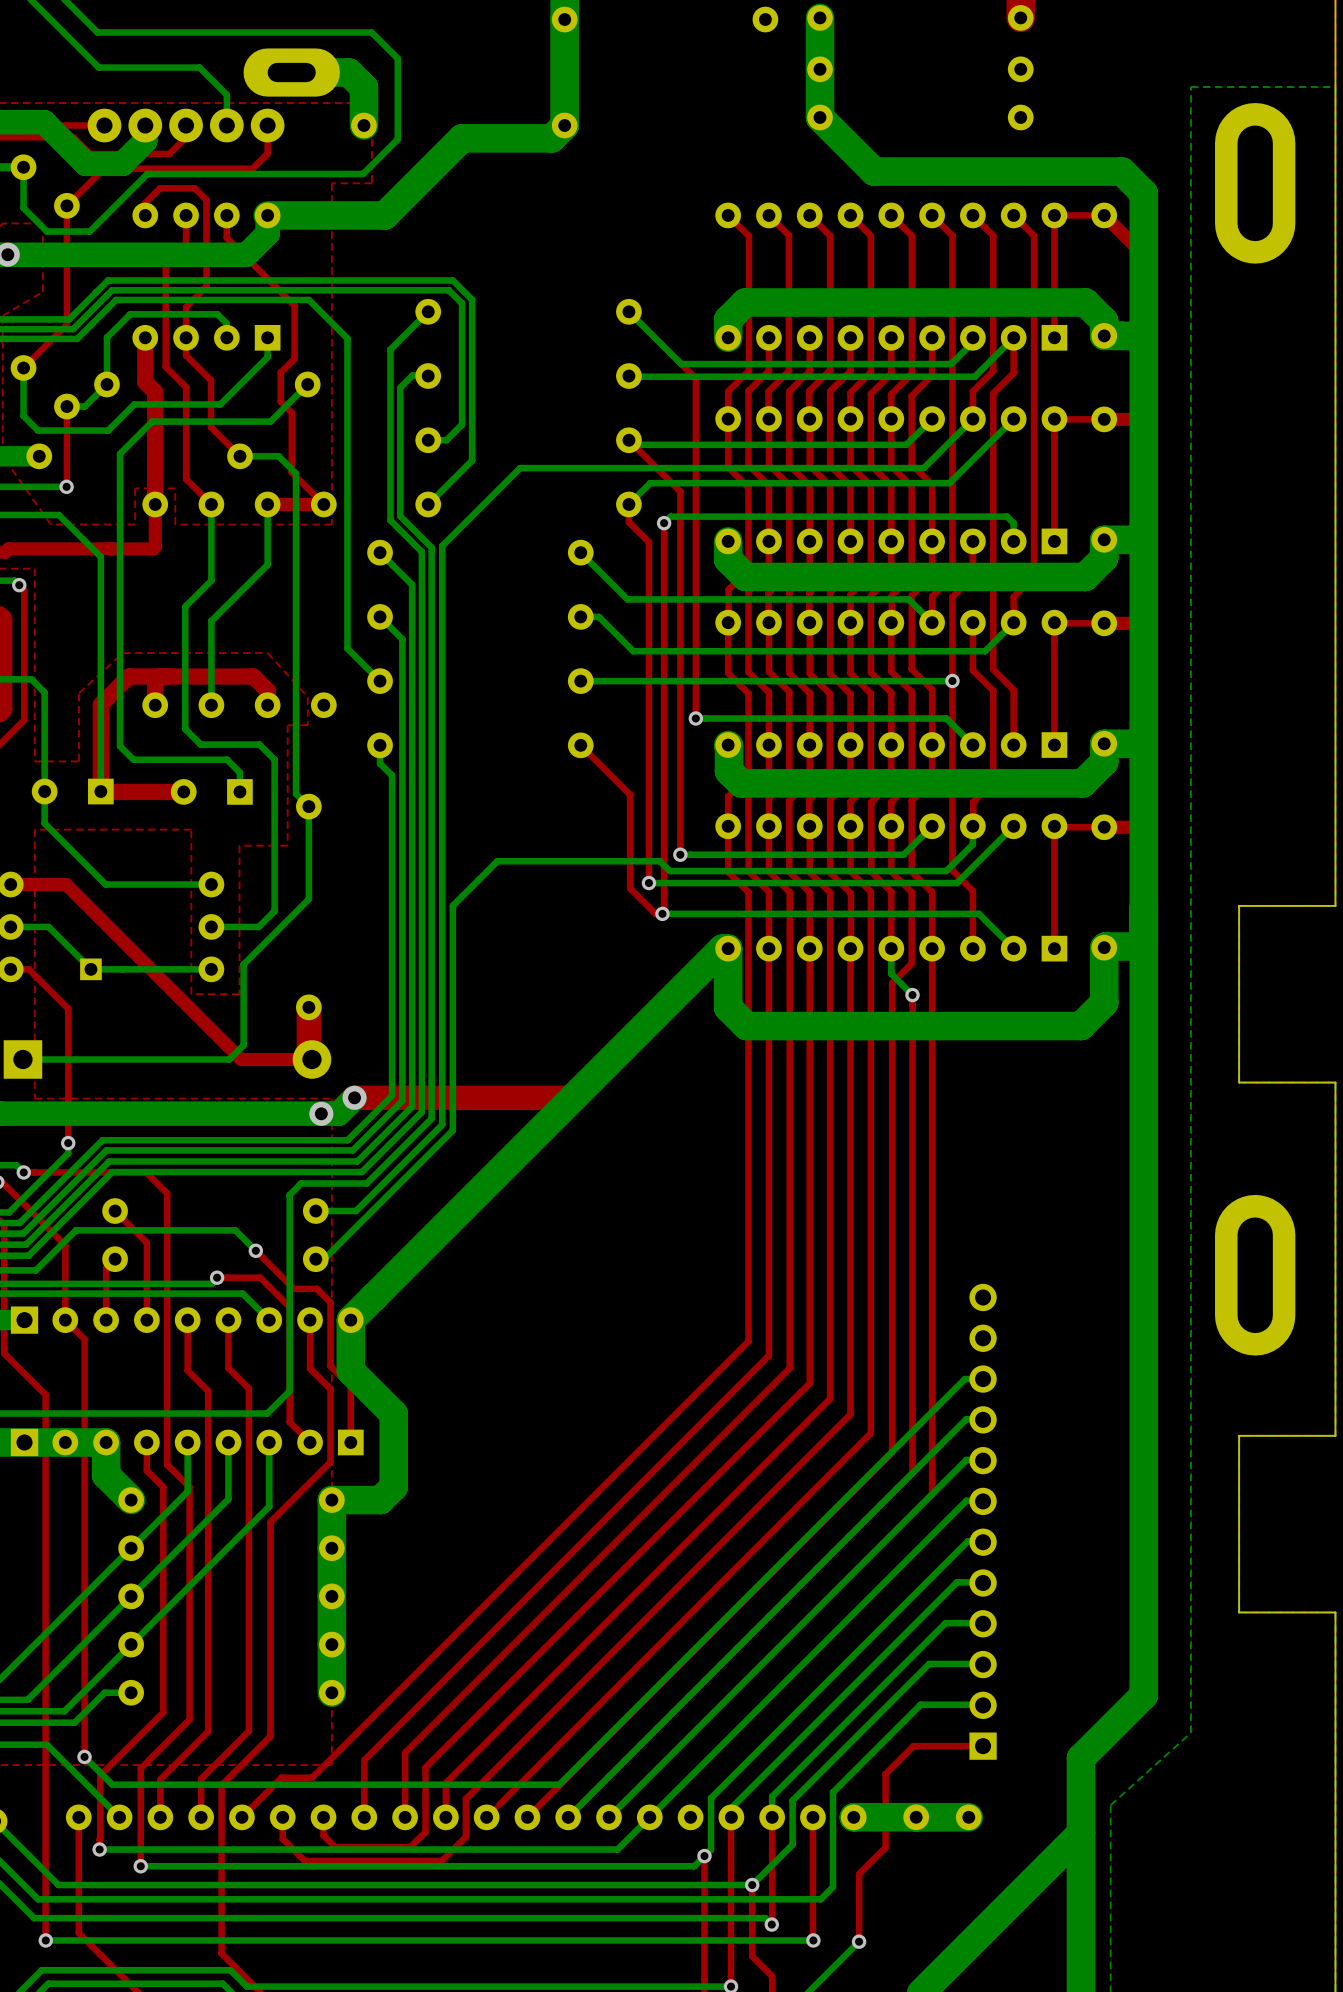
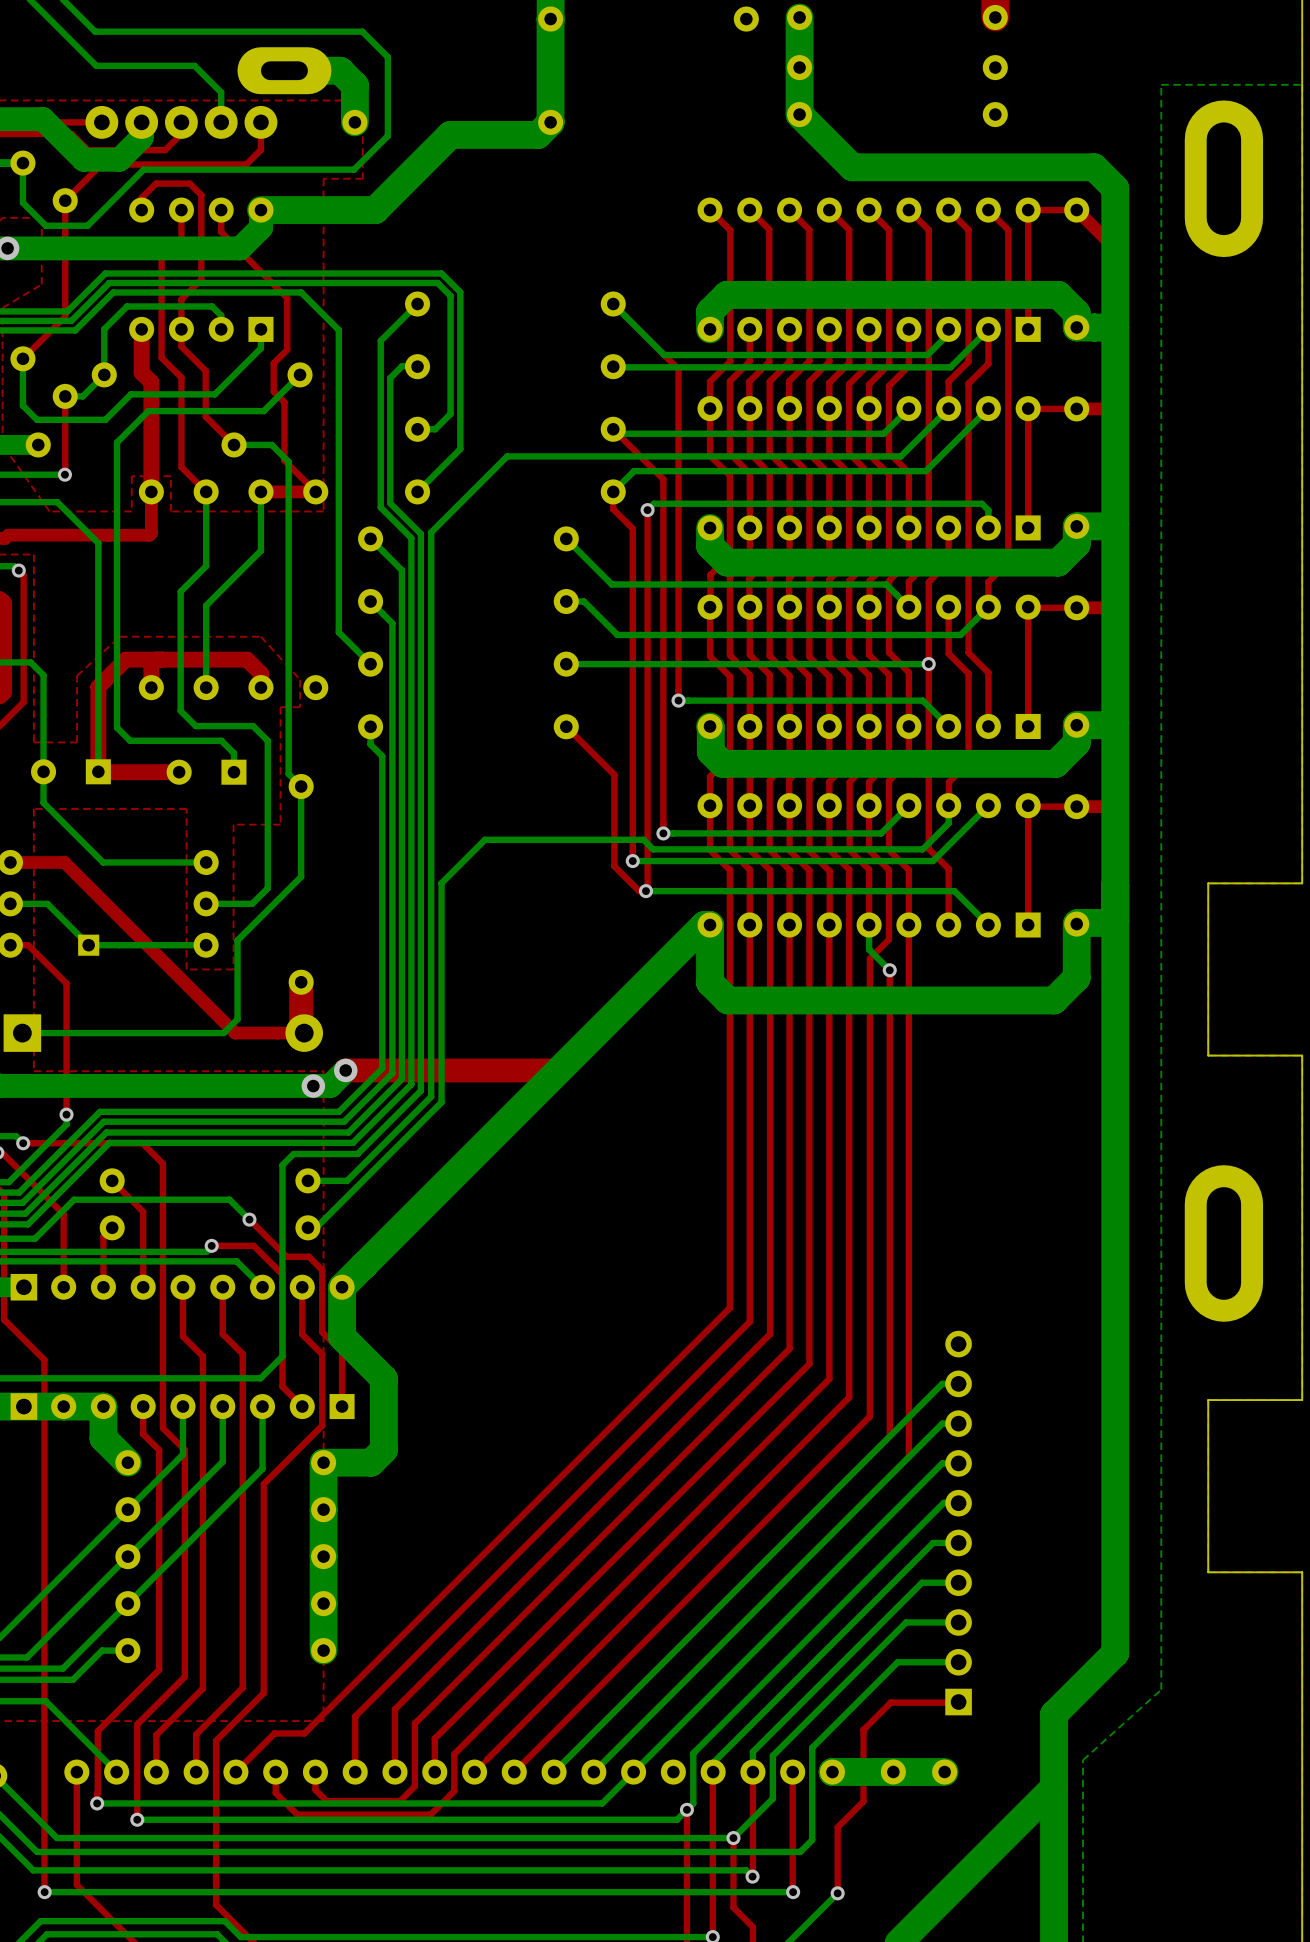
top track: (65, 1320) (84, 1339) (84, 1756) -> none
bottom track: (983, 1379) (964, 1379) (559, 1784) (112, 1784) (84, 1756) -> none
part: (983, 1521) -> none
part: none -> (958, 1523)
via: (84, 1756) -> none

